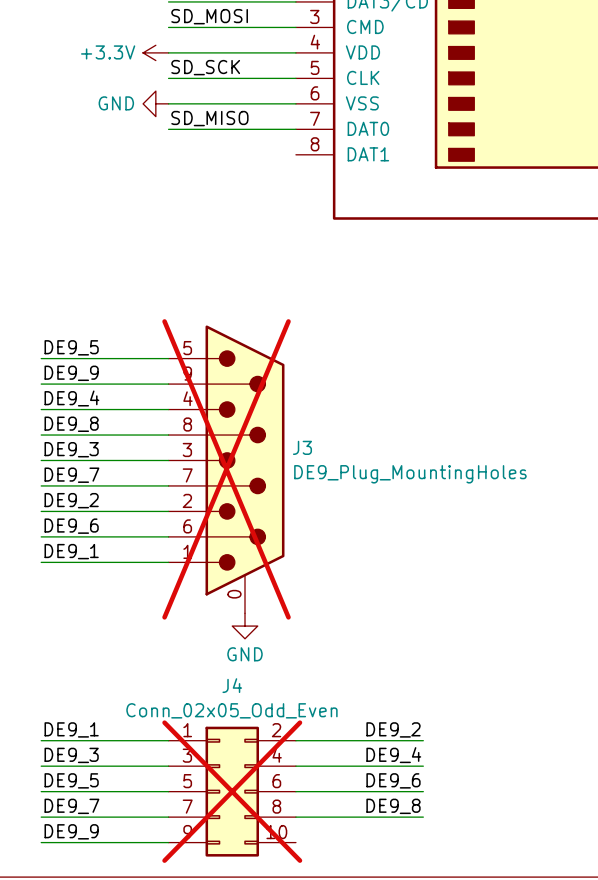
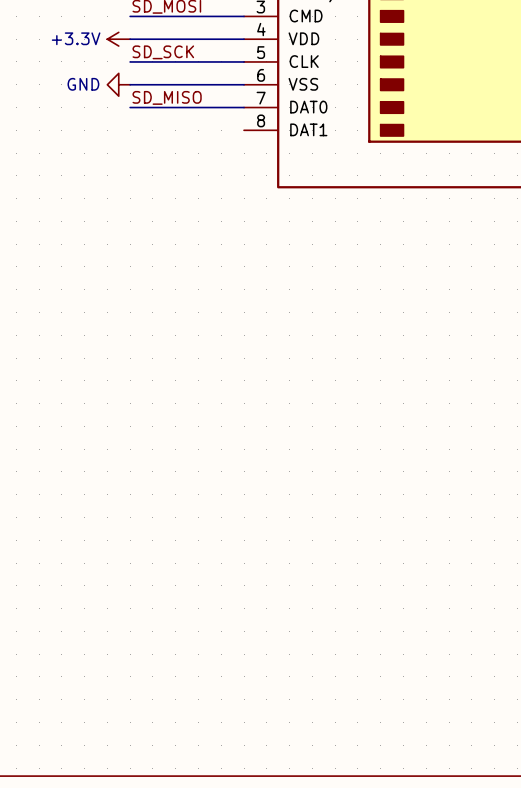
label: DE9_5 (71, 347) -> none
wire: (41, 358) (168, 358) -> none
label: DE9_9 (71, 373) -> none
wire: (41, 384) (168, 384) -> none
label: DE9_4 (71, 398) -> none
wire: (41, 409) (168, 409) -> none
label: DE9_8 (71, 424) -> none
wire: (41, 435) (168, 435) -> none
label: DE9_3 (71, 449) -> none
wire: (41, 460) (168, 460) -> none
J3: DE9_Plug_MountingHoles (226, 469) -> none
label: DE9_7 (71, 475) -> none
wire: (41, 485) (168, 485) -> none
label: DE9_2 (71, 500) -> none
wire: (41, 511) (168, 511) -> none
label: DE9_6 (71, 526) -> none
wire: (41, 536) (168, 536) -> none
label: DE9_1 (71, 551) -> none
wire: (41, 562) (168, 562) -> none
power symbol: GND (245, 626) -> none
label: DE9_1 (71, 729) -> none
label: DE9_2 (393, 729) -> none
wire: (41, 740) (168, 740) -> none
wire: (295, 740) (423, 740) -> none
label: DE9_3 (71, 755) -> none
label: DE9_4 (393, 755) -> none
wire: (41, 766) (168, 766) -> none
wire: (295, 766) (423, 766) -> none
label: DE9_5 (71, 780) -> none
label: DE9_6 (393, 780) -> none
wire: (41, 791) (168, 791) -> none
J4: Conn_02x05_Odd_Even (232, 791) -> none
wire: (295, 791) (423, 791) -> none
label: DE9_7 (71, 806) -> none
label: DE9_8 (393, 806) -> none
wire: (41, 817) (168, 817) -> none
wire: (295, 817) (423, 817) -> none
label: DE9_9 (71, 831) -> none
wire: (41, 842) (168, 842) -> none

